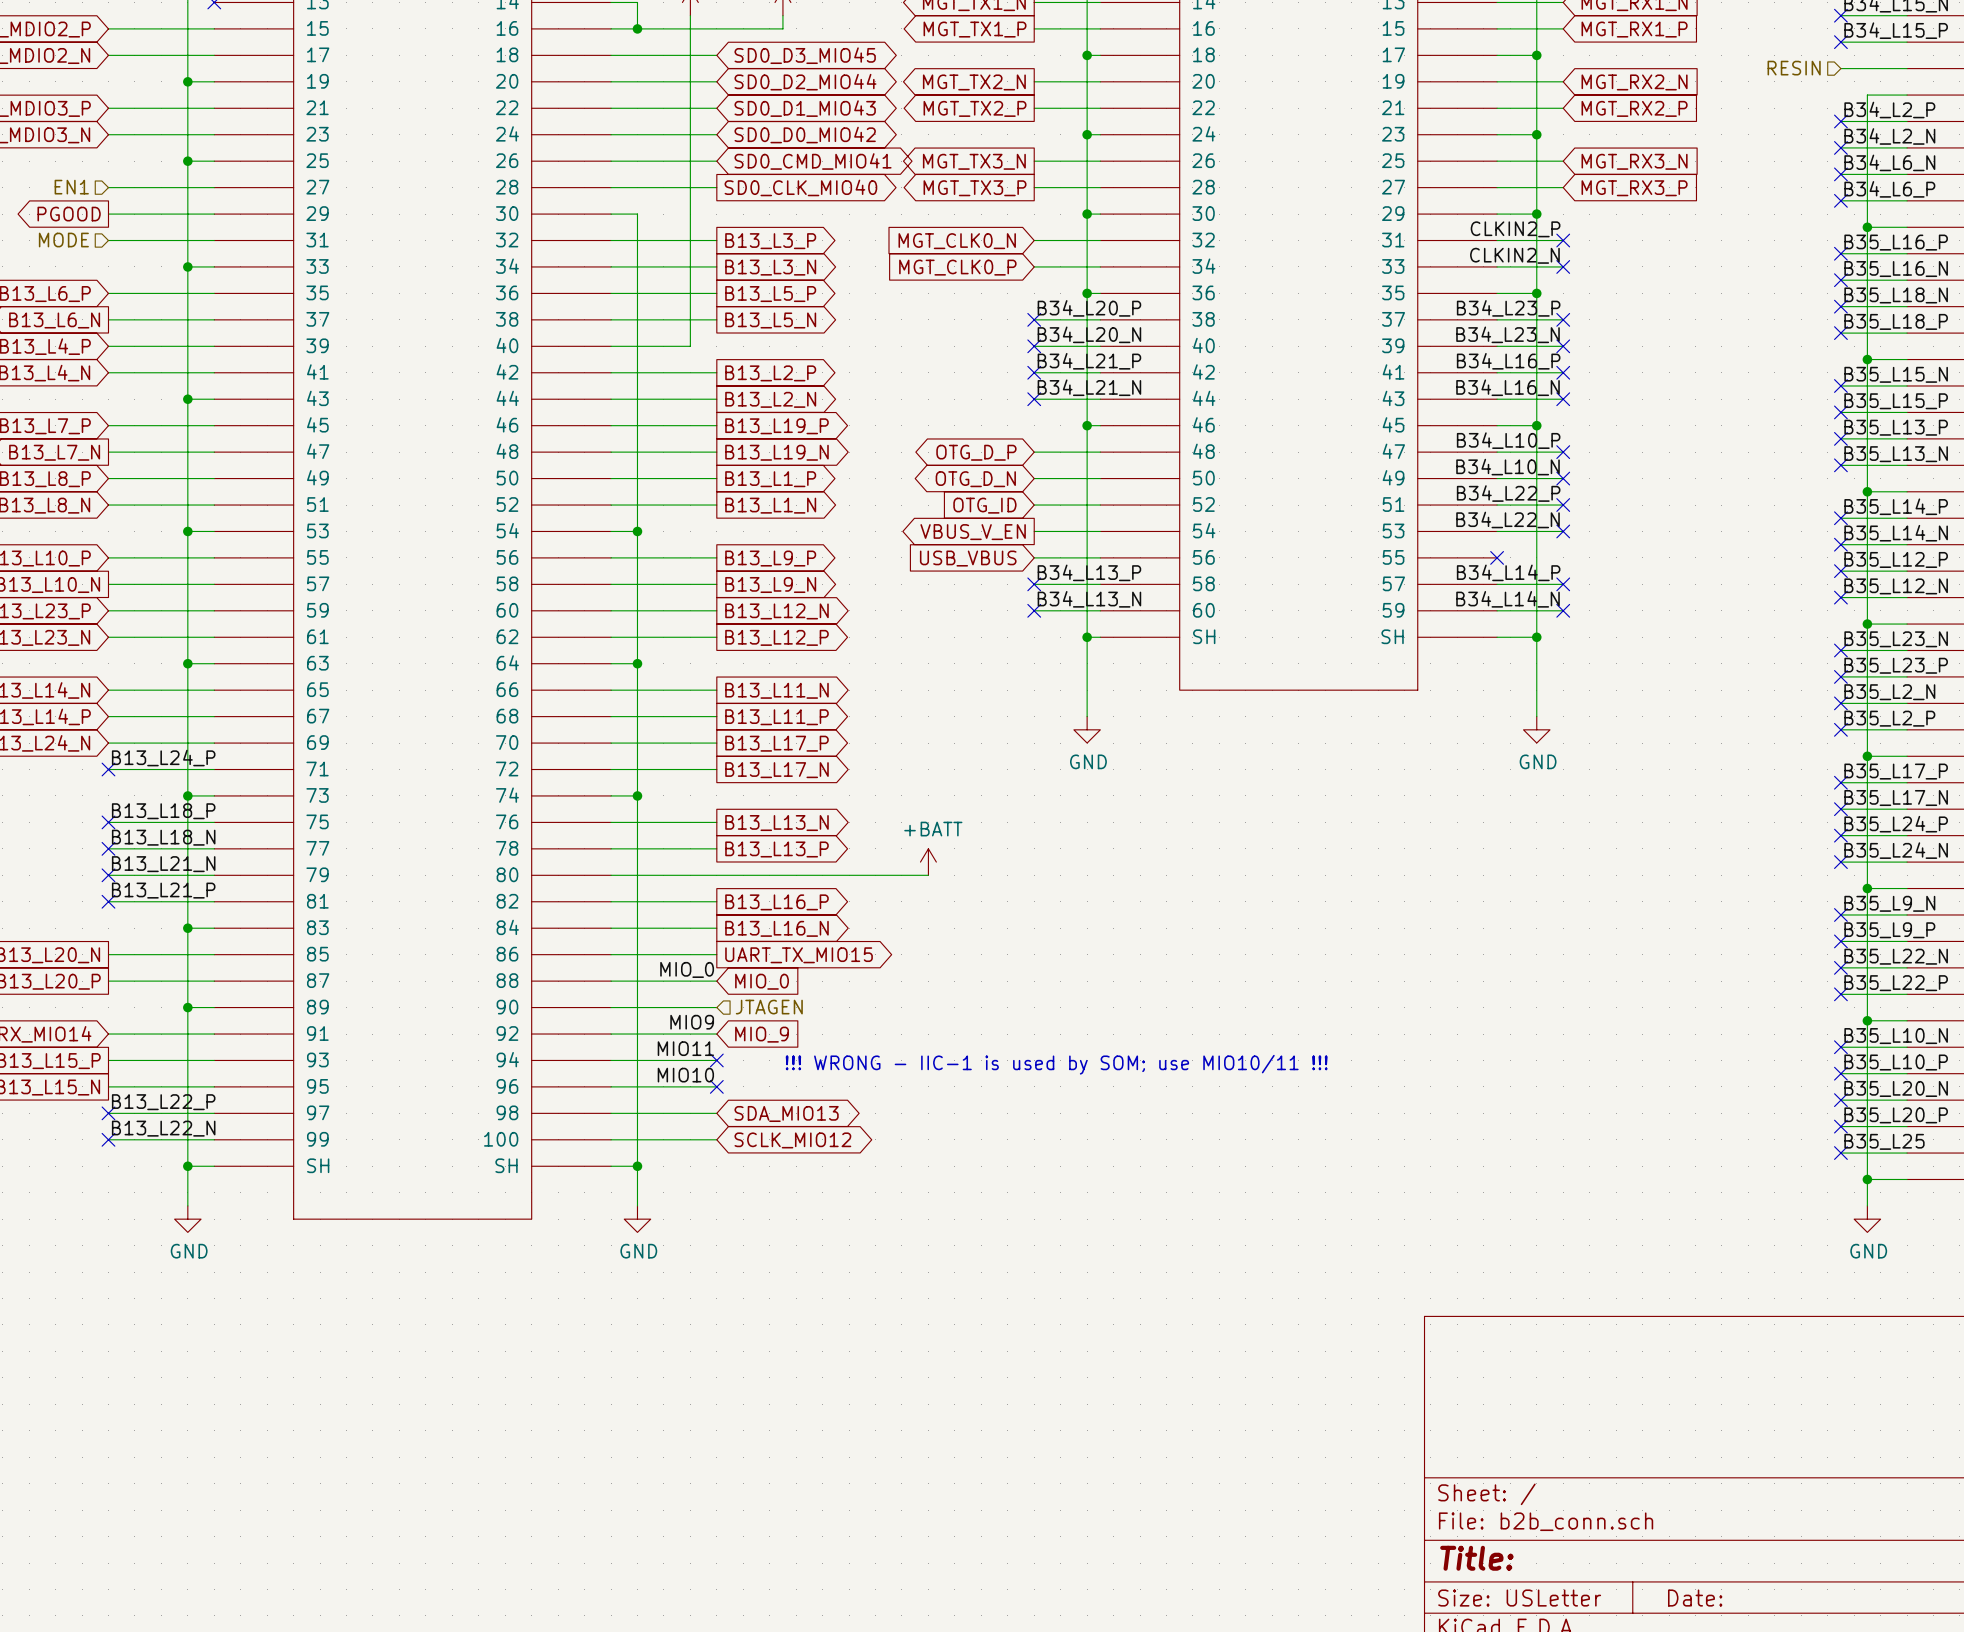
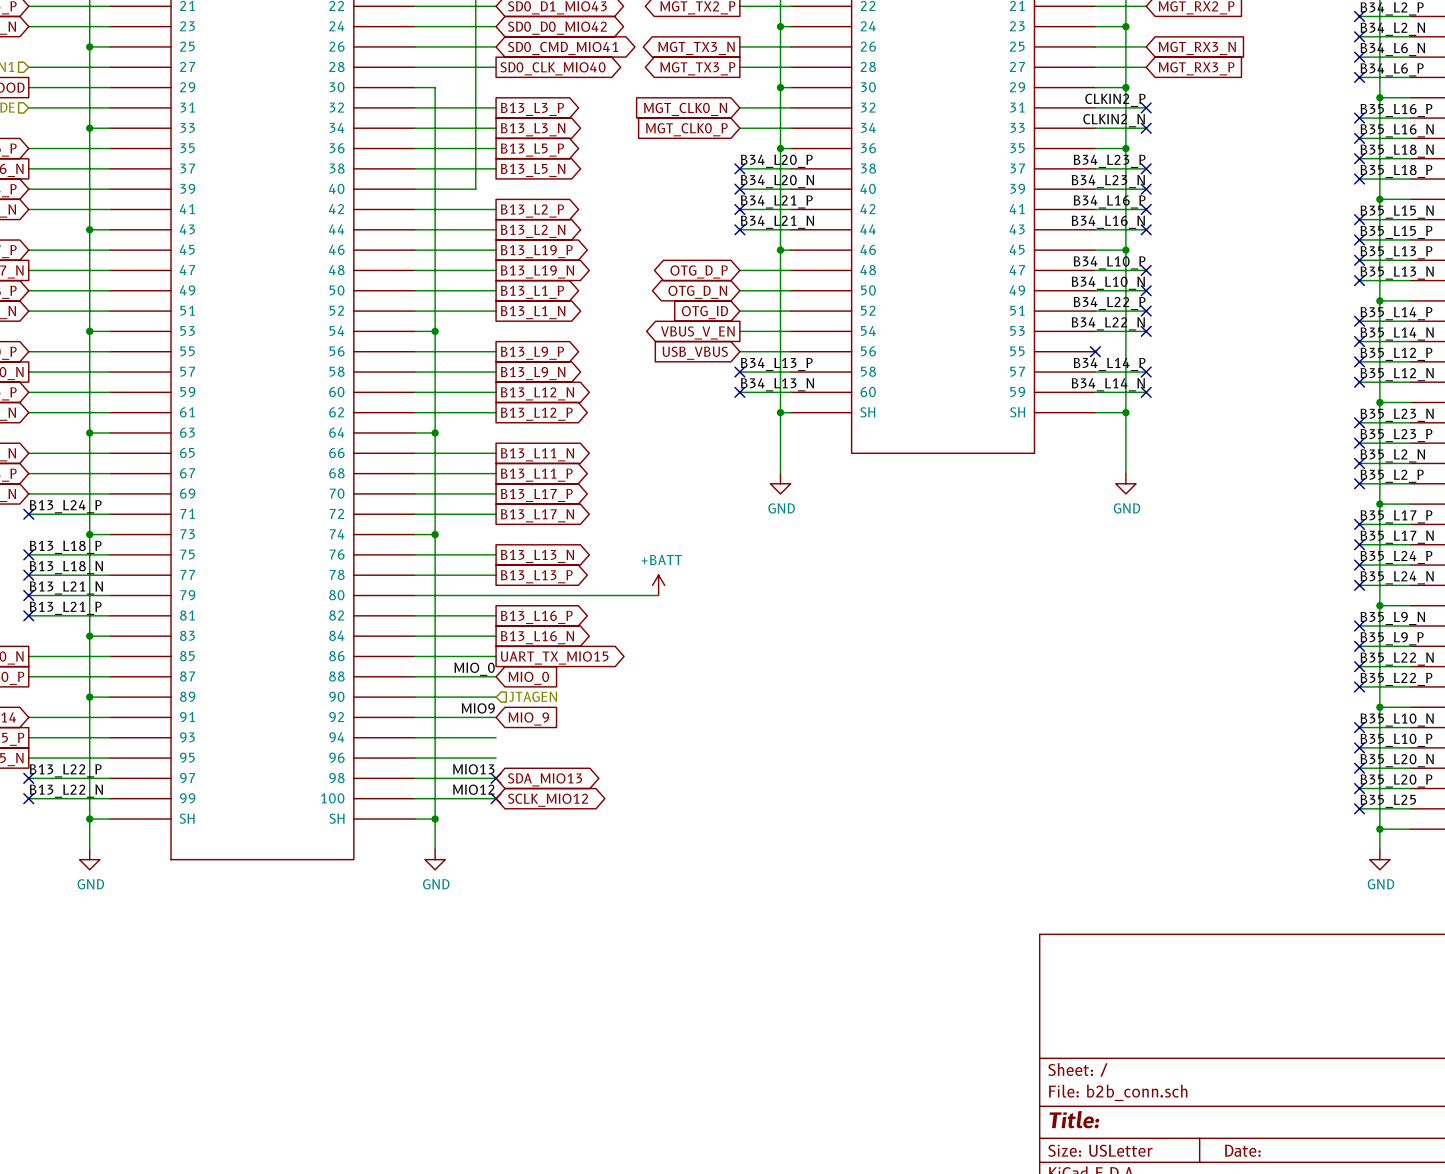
label: MIO11 (685, 1048) -> none
no-connect mark: (716, 1060) -> none
text: !!! WRONG - IIC-1 is used by SOM; use MIO10/11 !!! (1056, 1064) -> none
label: MIO10 (685, 1075) -> MIO13 (473, 769)
no-connect mark: (716, 1086) -> none
no-connect mark: none -> (496, 778)
label: none -> MIO12 (473, 789)
no-connect mark: none -> (496, 798)

